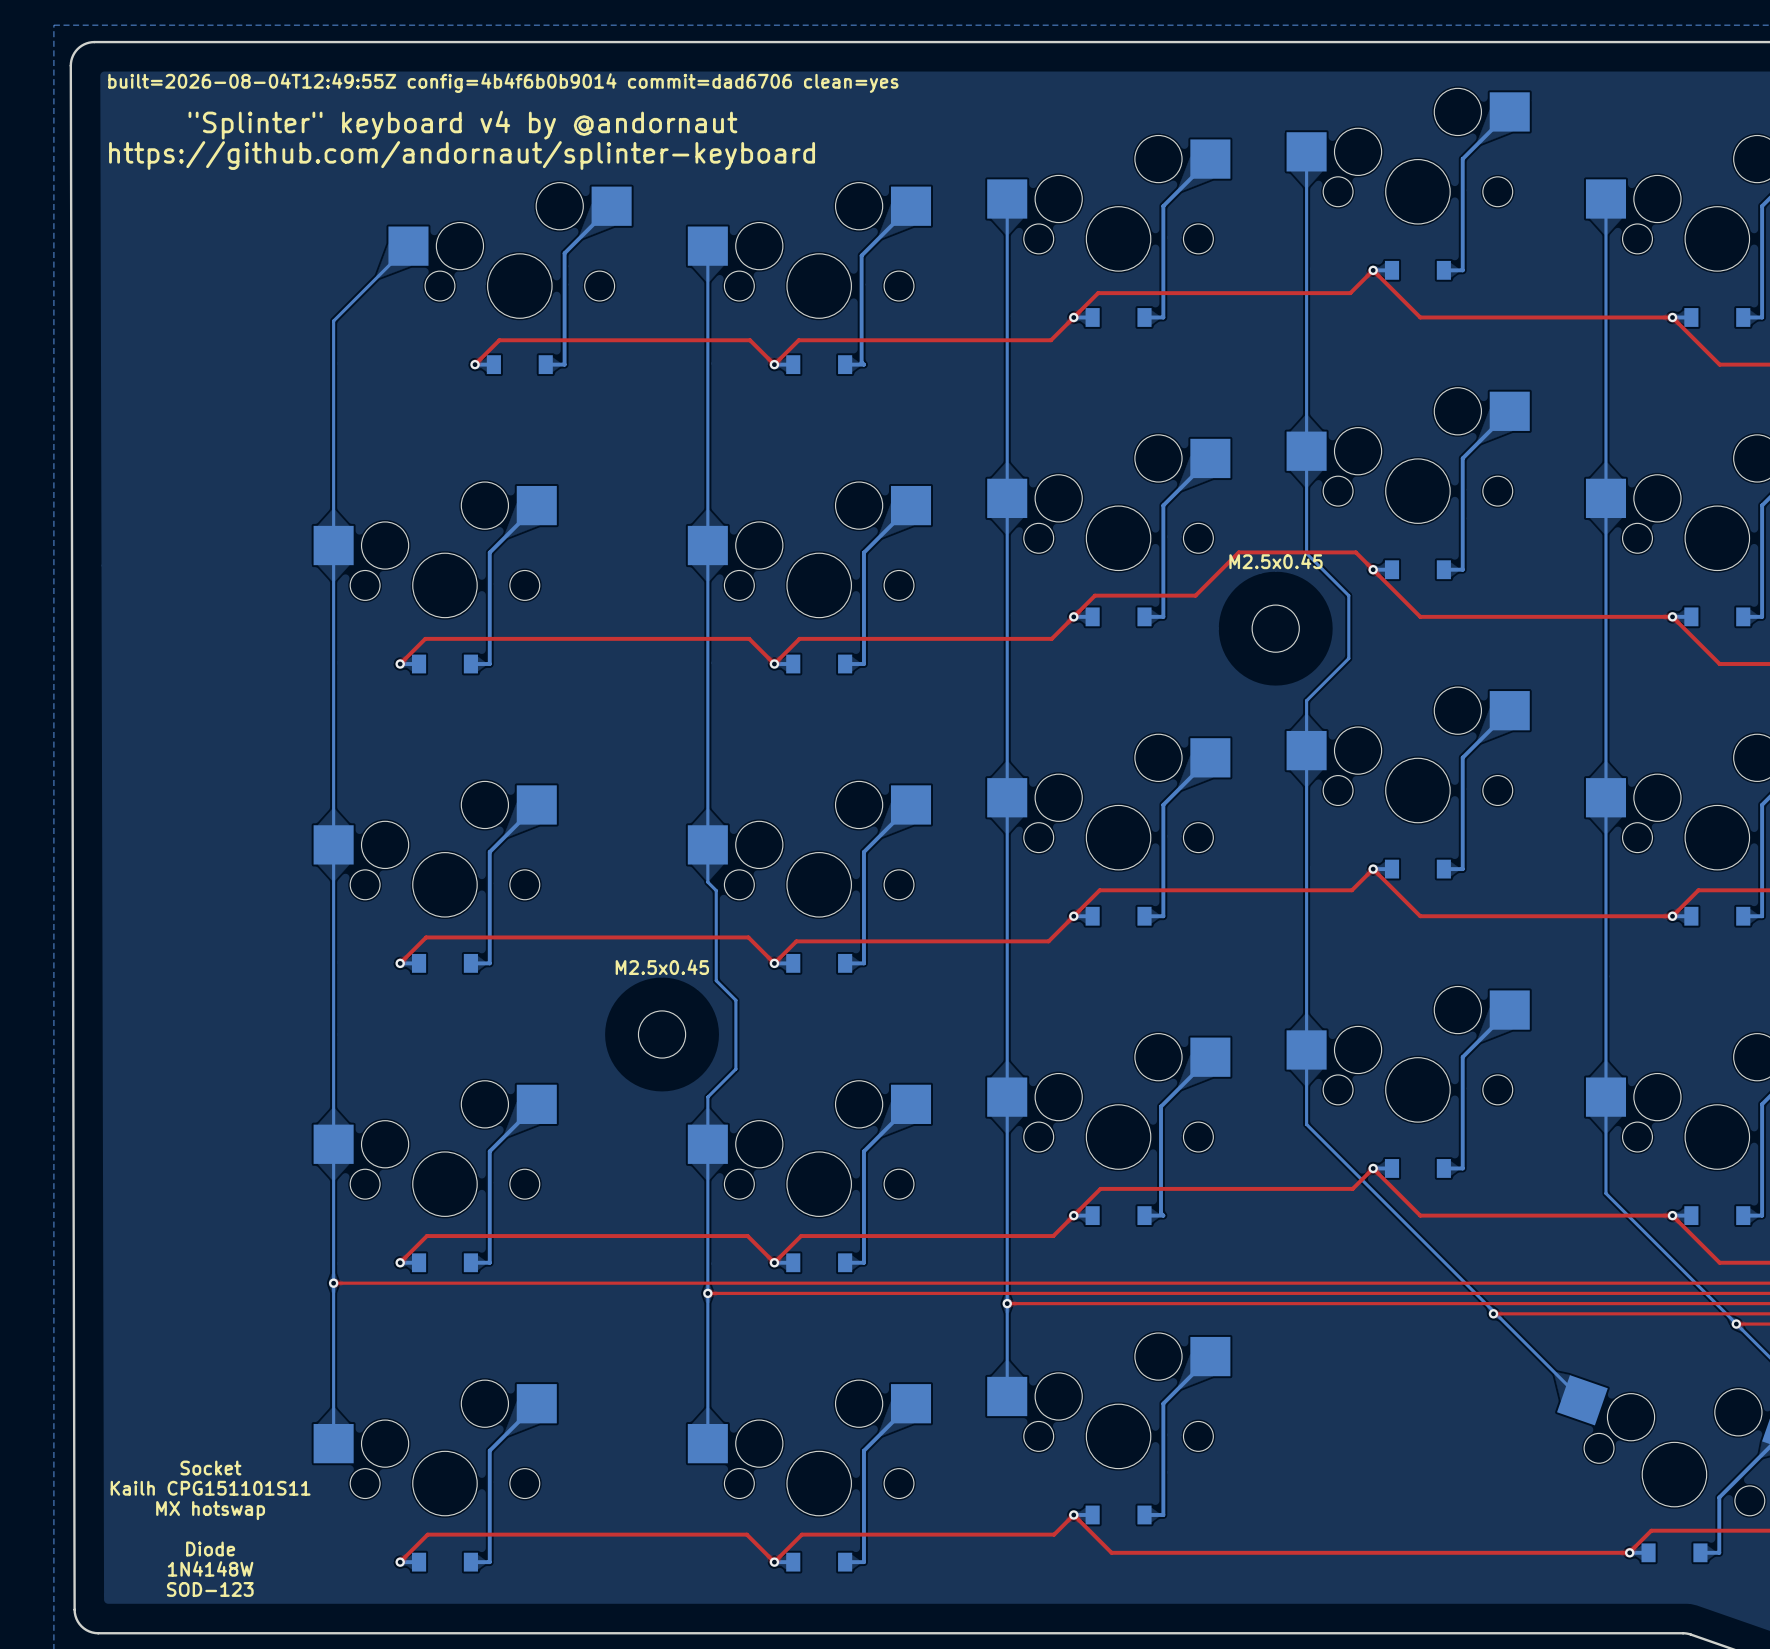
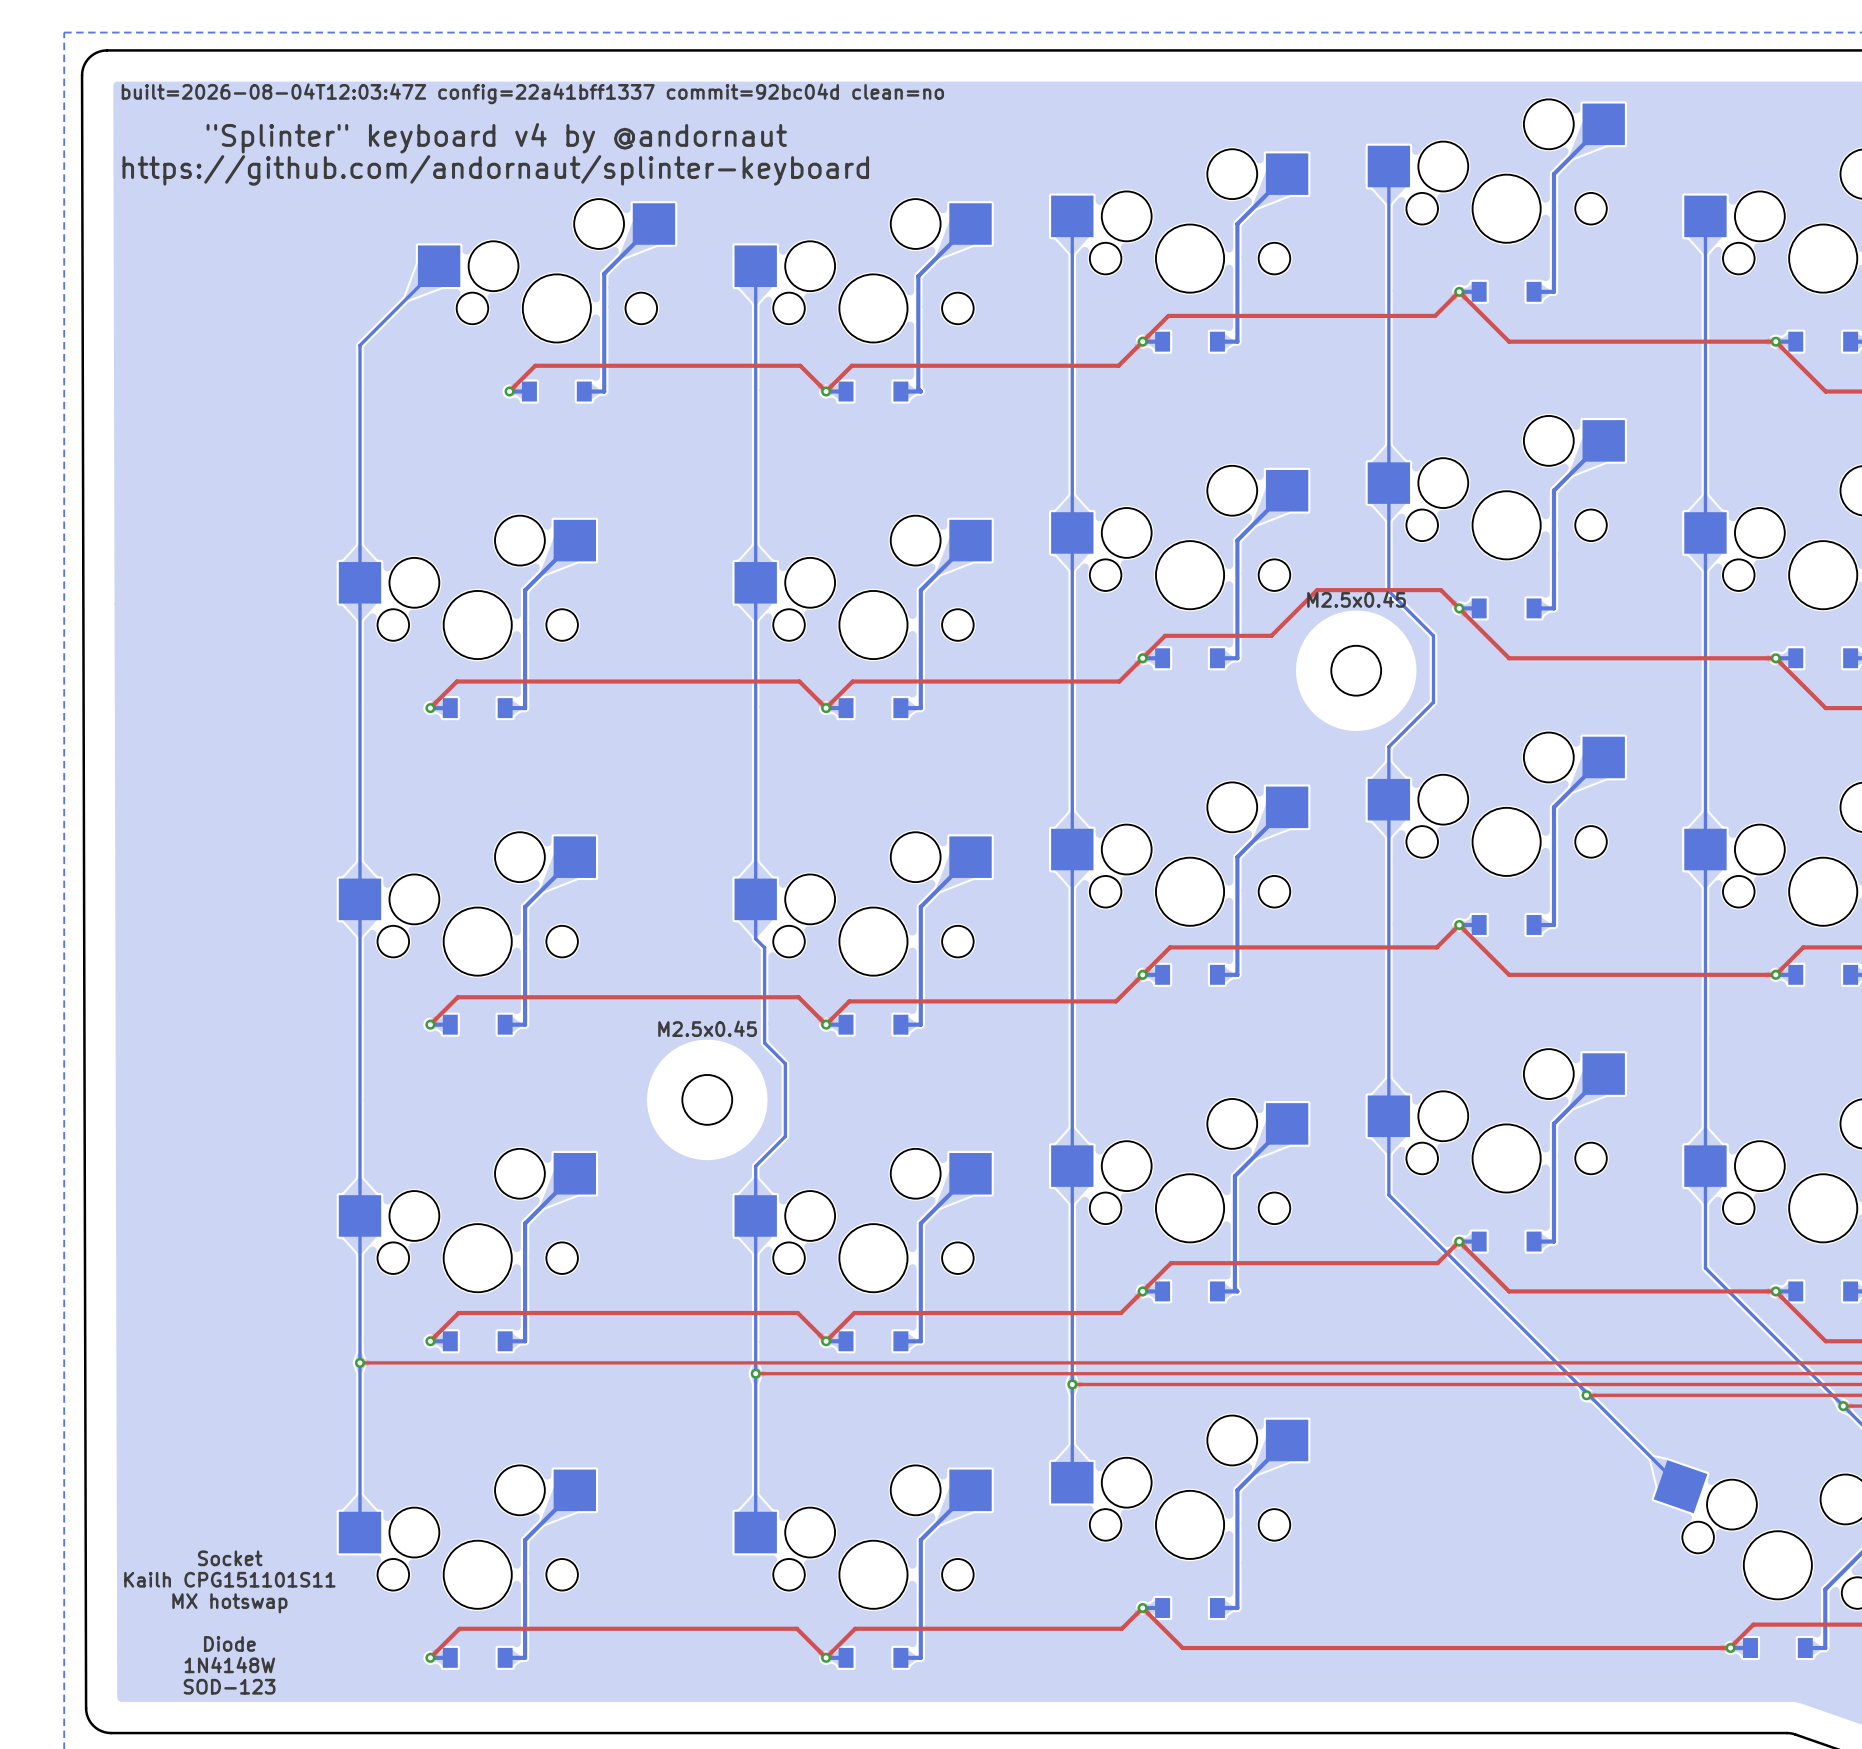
text: built=2026-08-04T12:49:55Z config=4b4f6b0b9014 commit=dad6706 clean=yes (503, 83) -> built=2026-08-04T12:03:47Z config=22a41bff1337 commit=92bc04d clean=no (532, 93)

